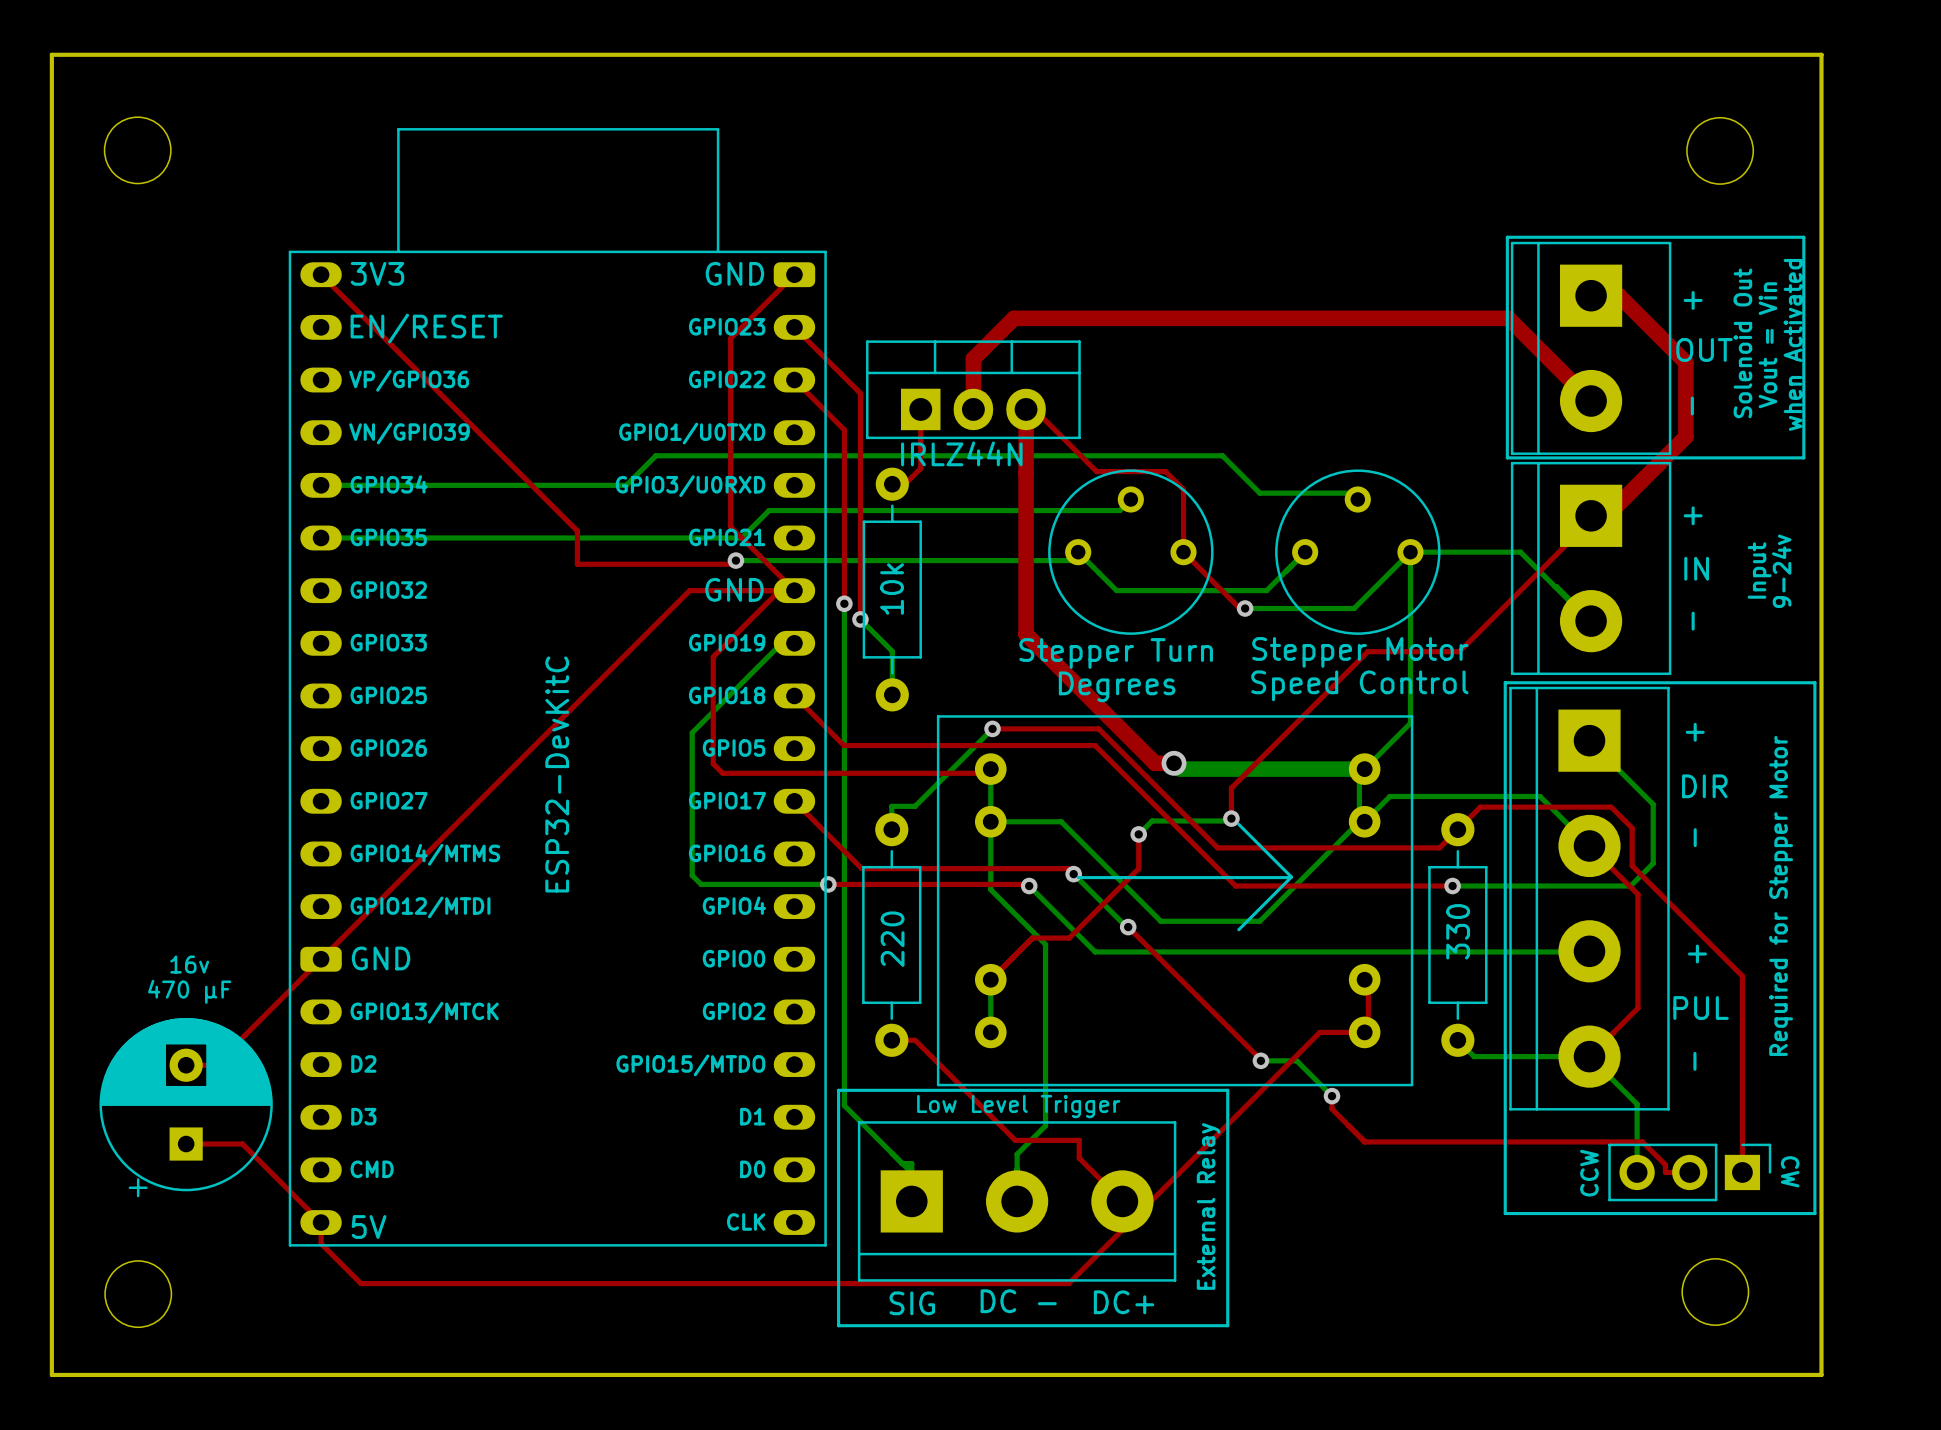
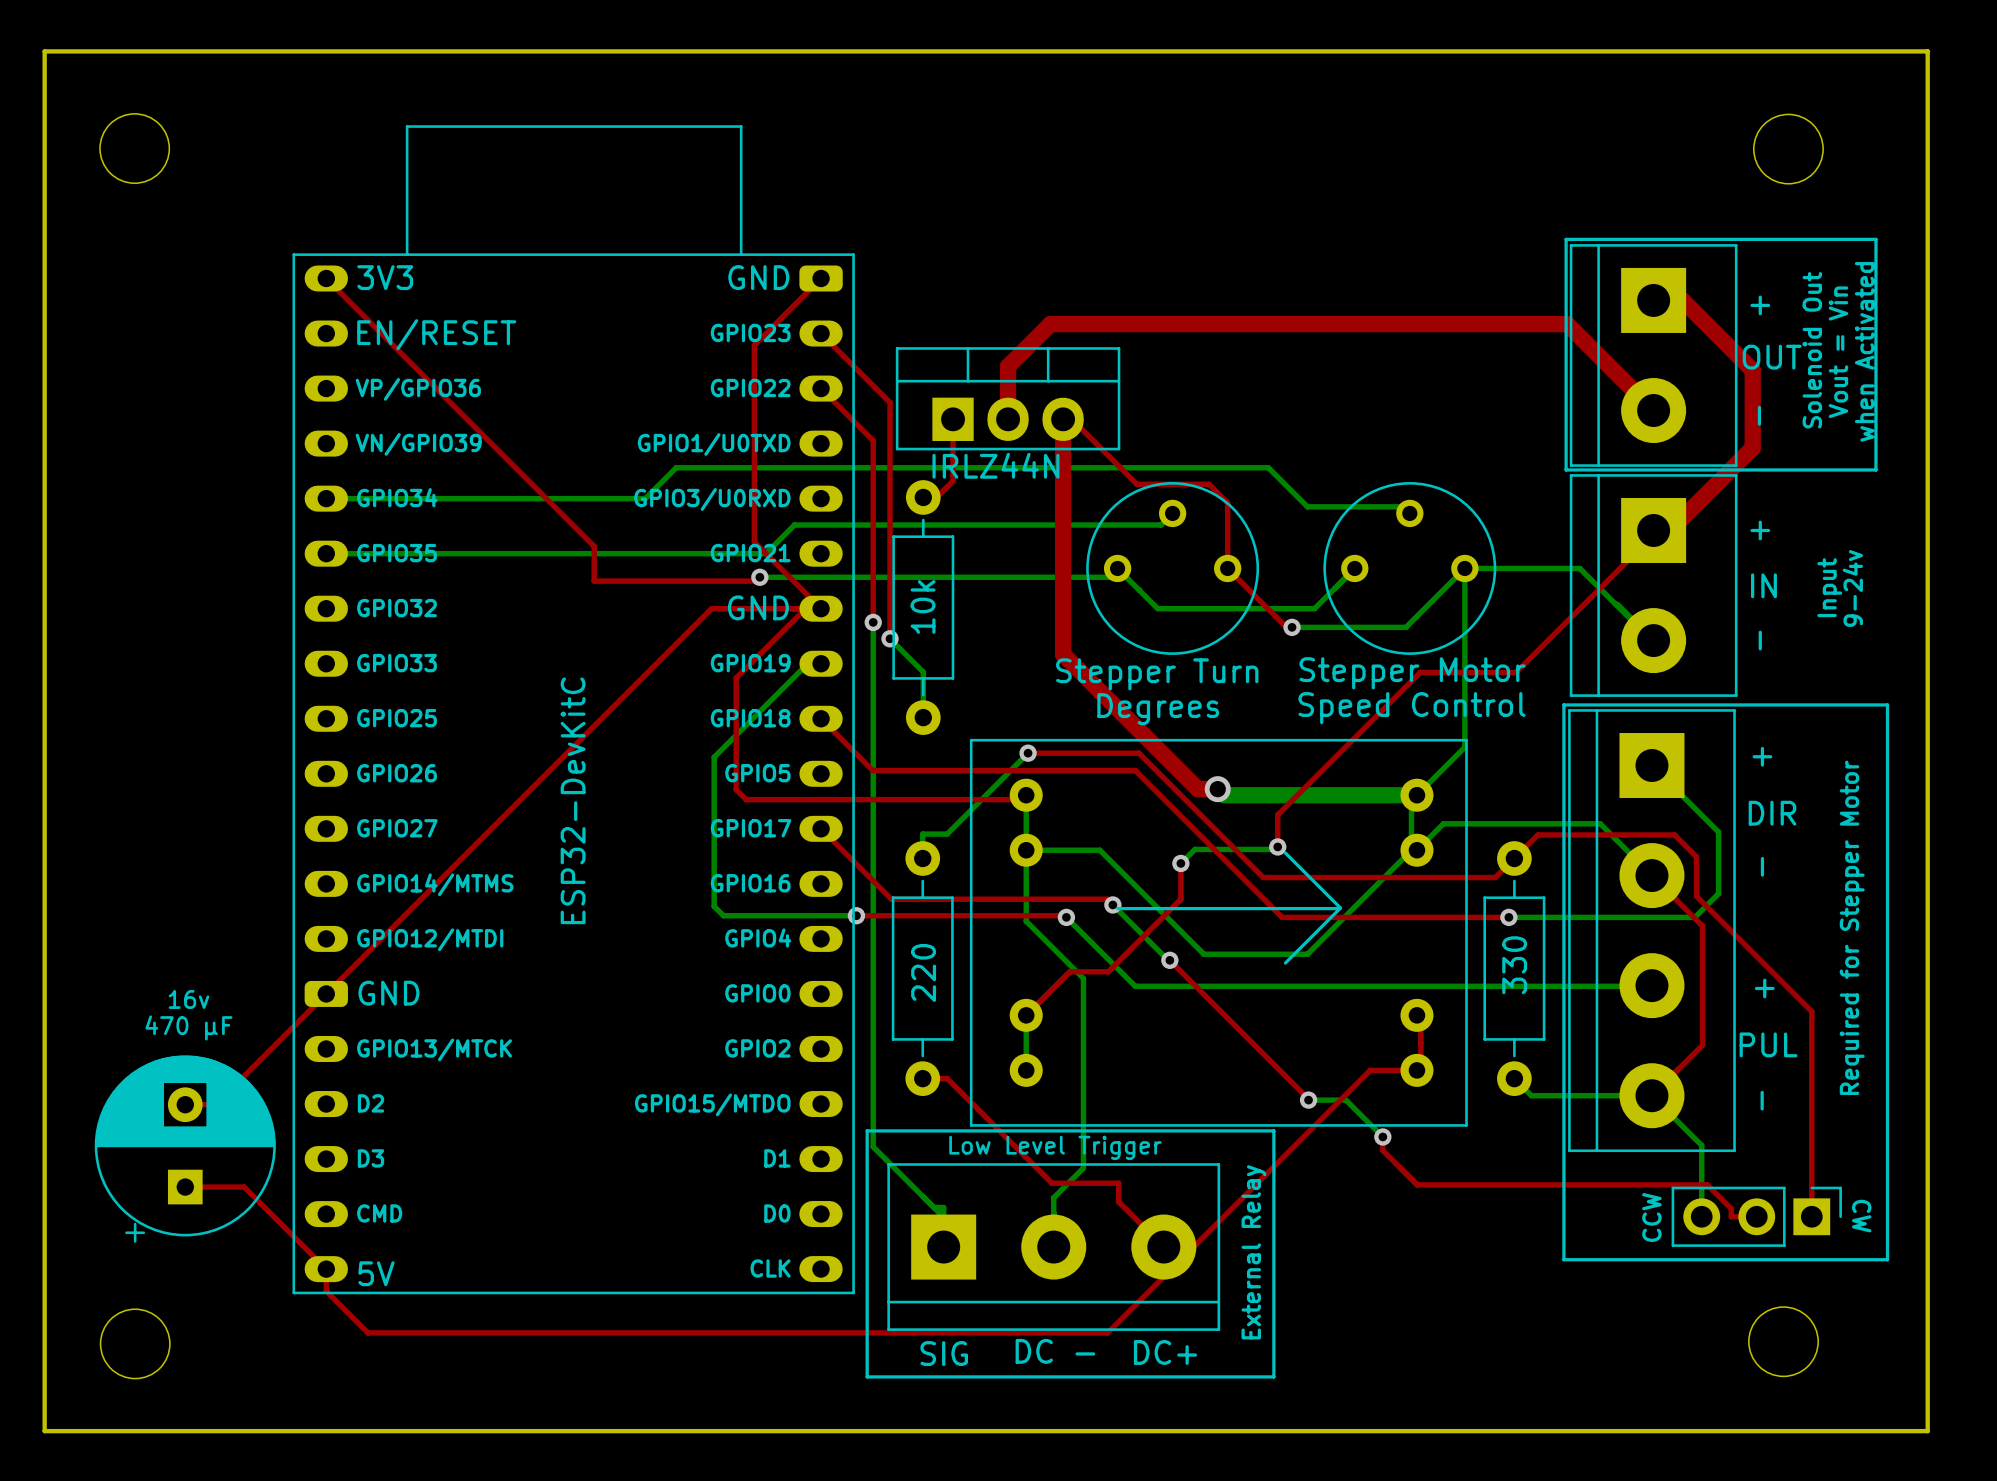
board edge: (51, 54) (1821, 54) (1821, 1374) (51, 1374) (51, 54) -> (44, 51) (44, 1431) (1927, 1431) (1927, 51) (44, 51)

